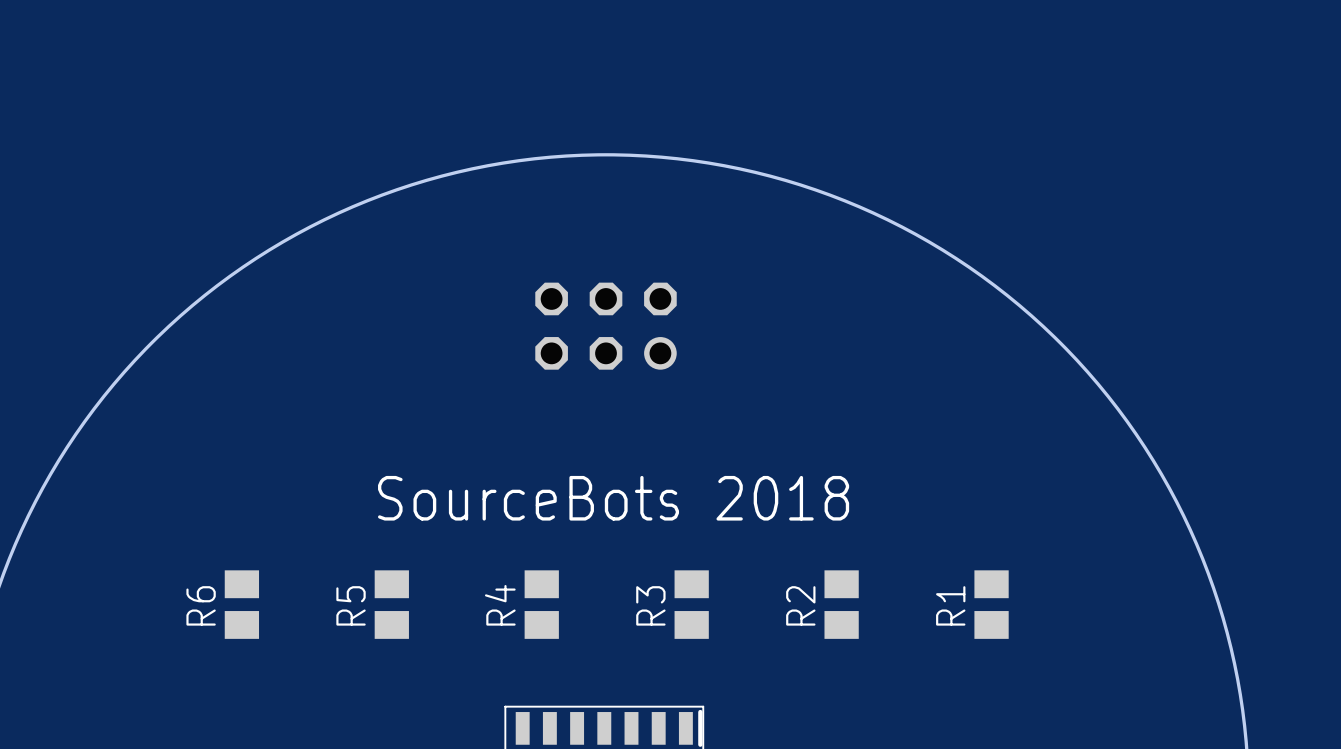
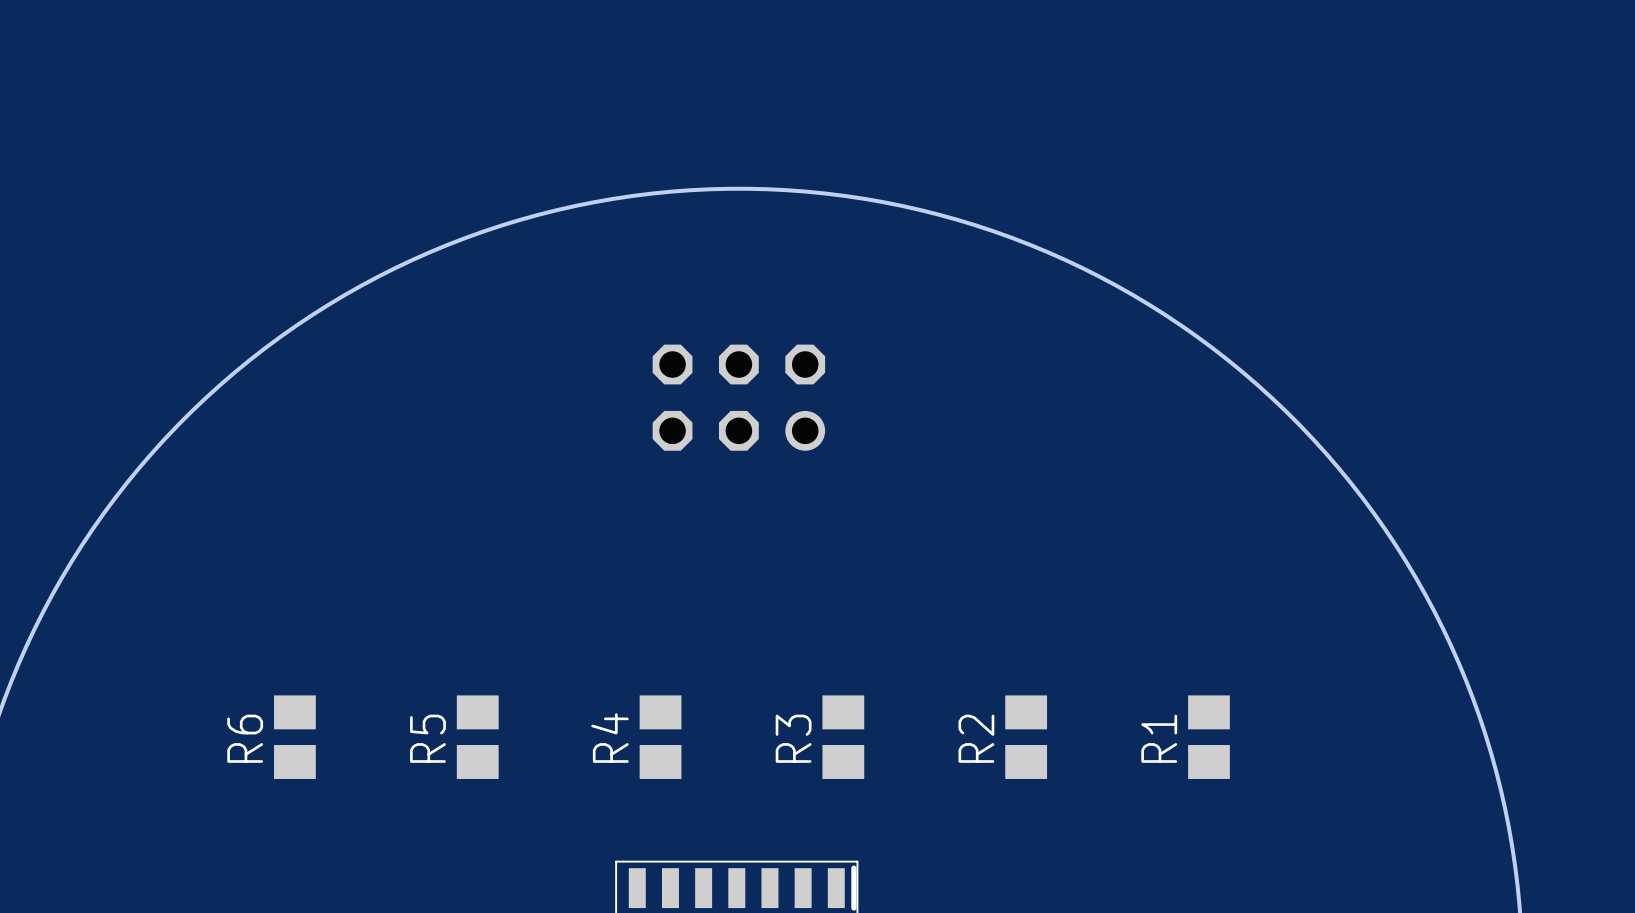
text: SourceBots 2018 (613, 498) -> none

